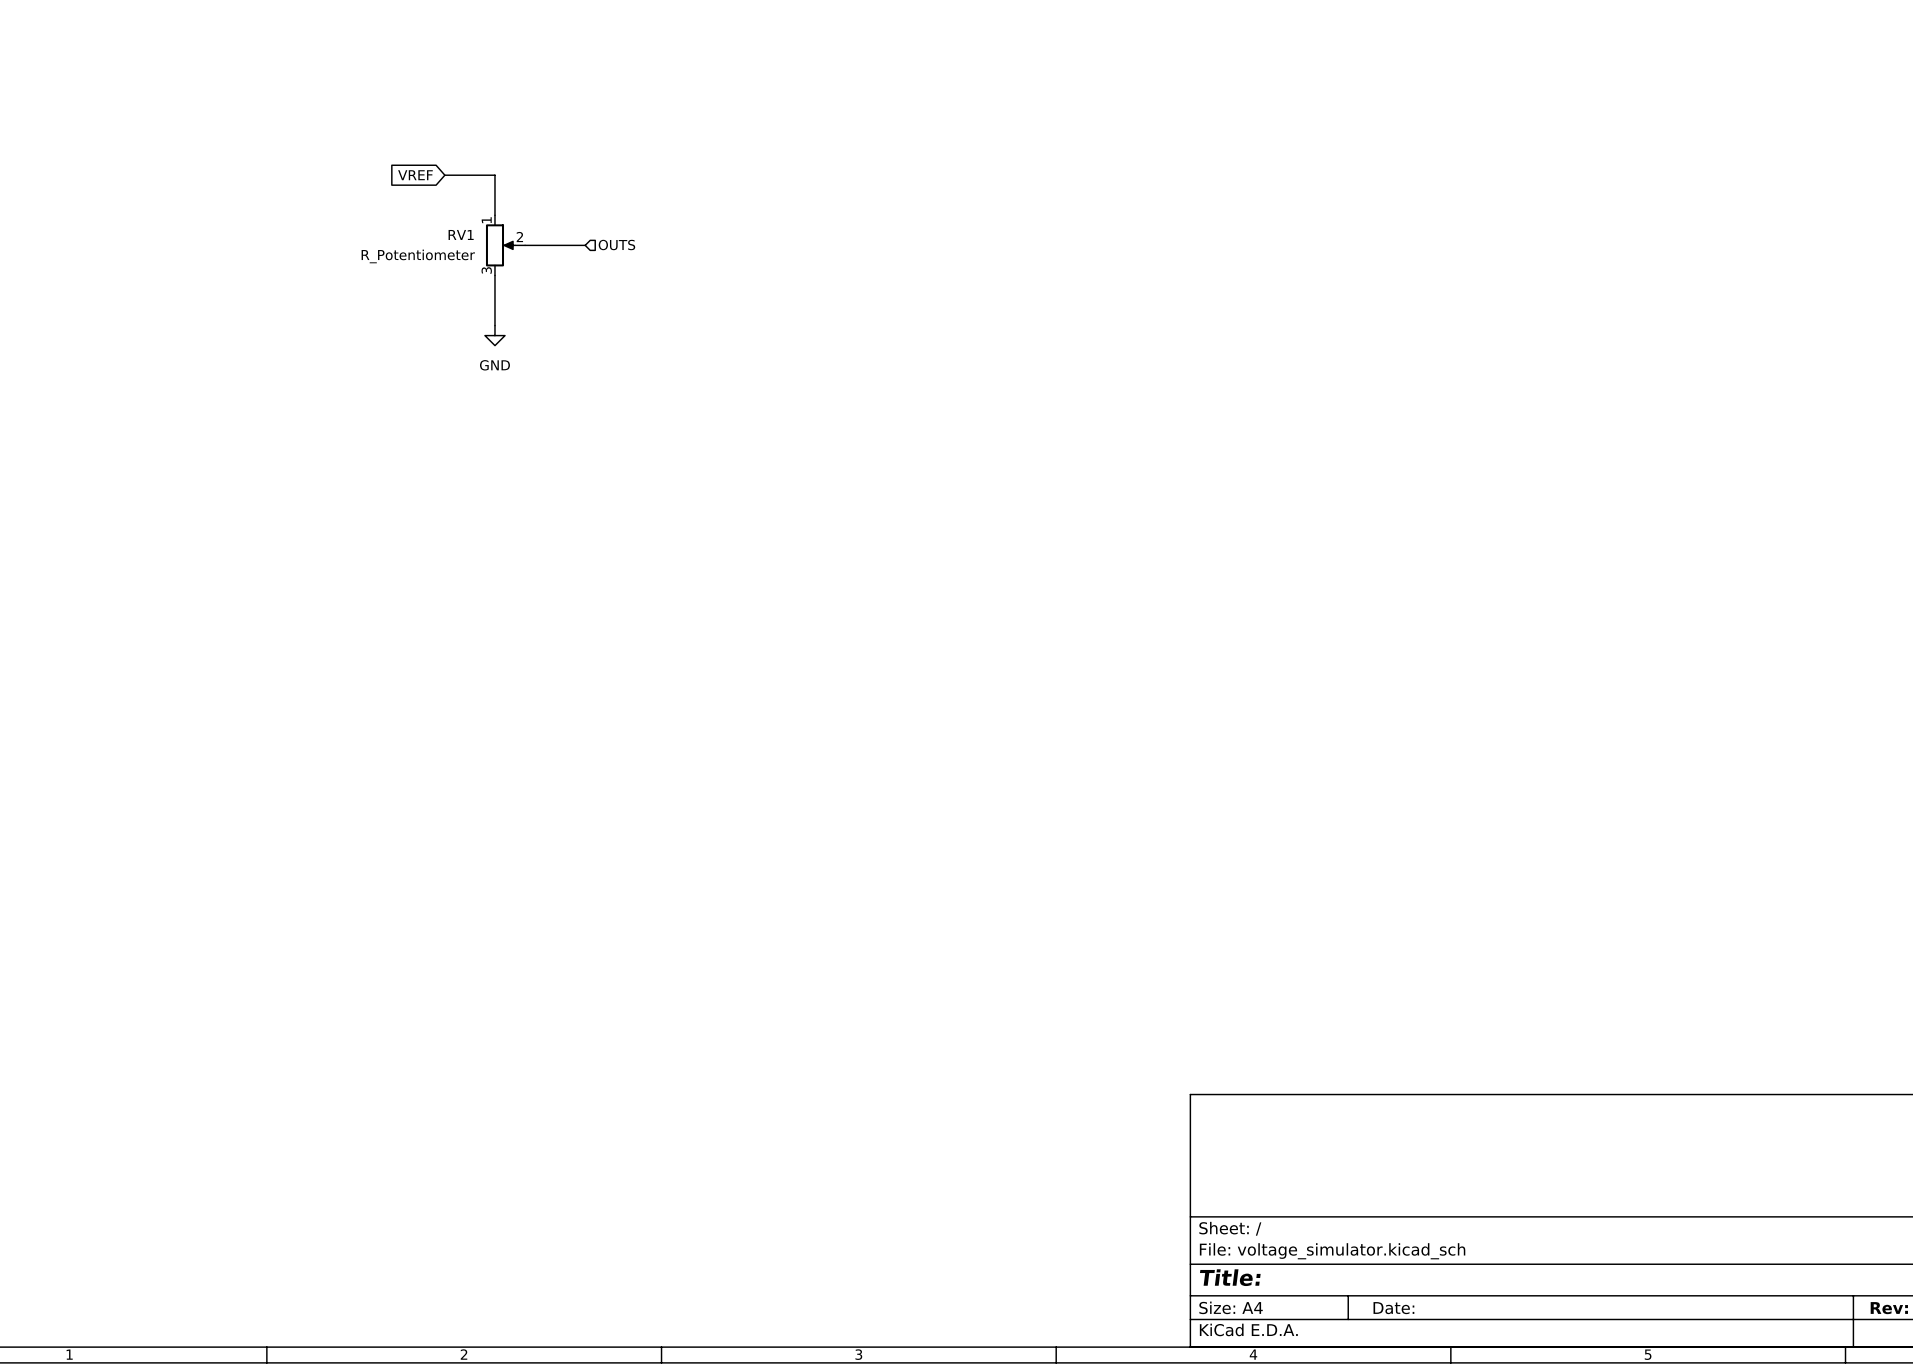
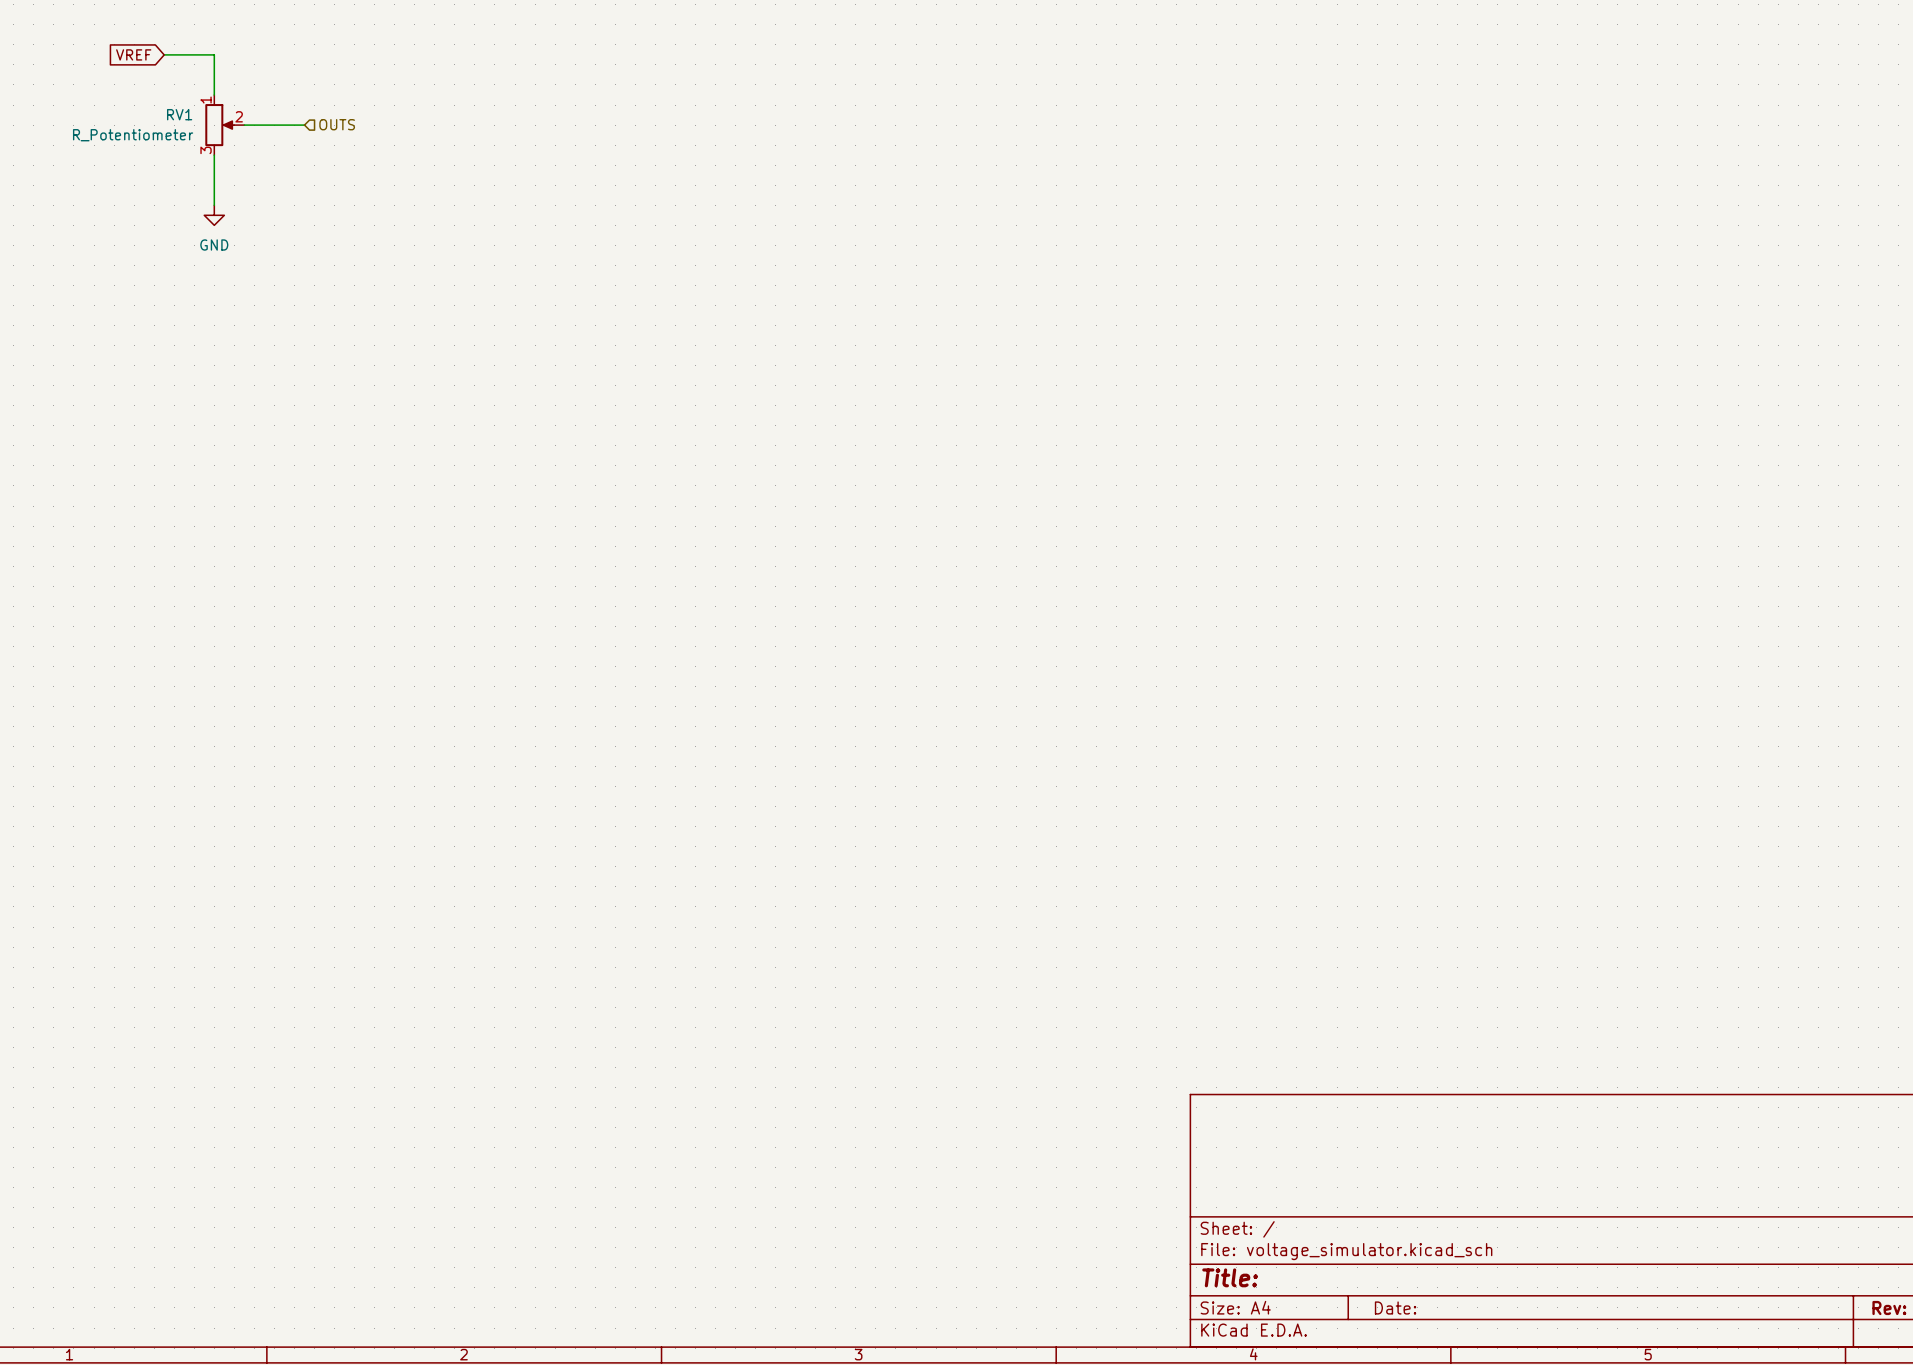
global label: none -> VREF (133, 54)
wire: none -> (164, 54) (214, 54) (214, 95)
hierarchical label: none -> OUTS (337, 124)
wire: none -> (244, 125) (304, 125)
wire: none -> (214, 155) (214, 205)
global label: VREF (415, 175) -> none
wire: (444, 175) (494, 175) (494, 215) -> none
power symbol: none -> GND (214, 215)
RV1 position: (505, 245) -> (224, 125)
wire: (525, 245) (585, 245) -> none
hierarchical label: OUTS (616, 245) -> none
wire: (494, 275) (494, 325) -> none
power symbol: GND (494, 335) -> none

